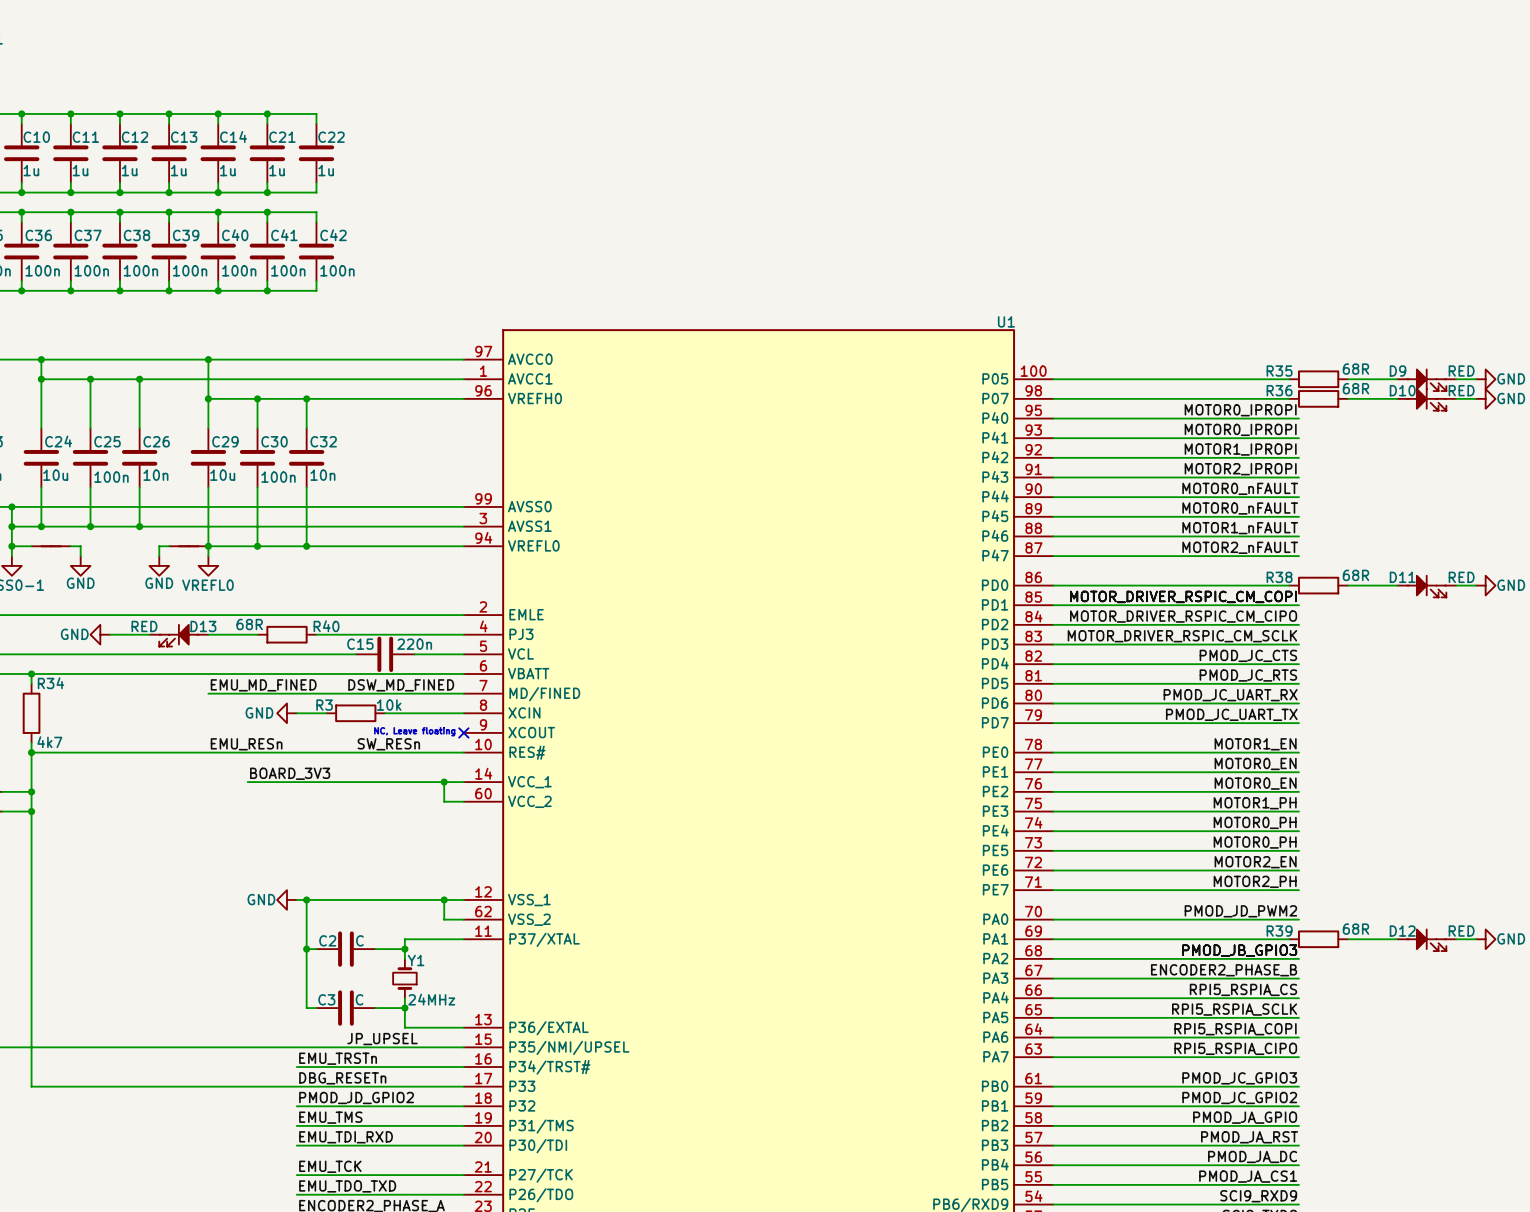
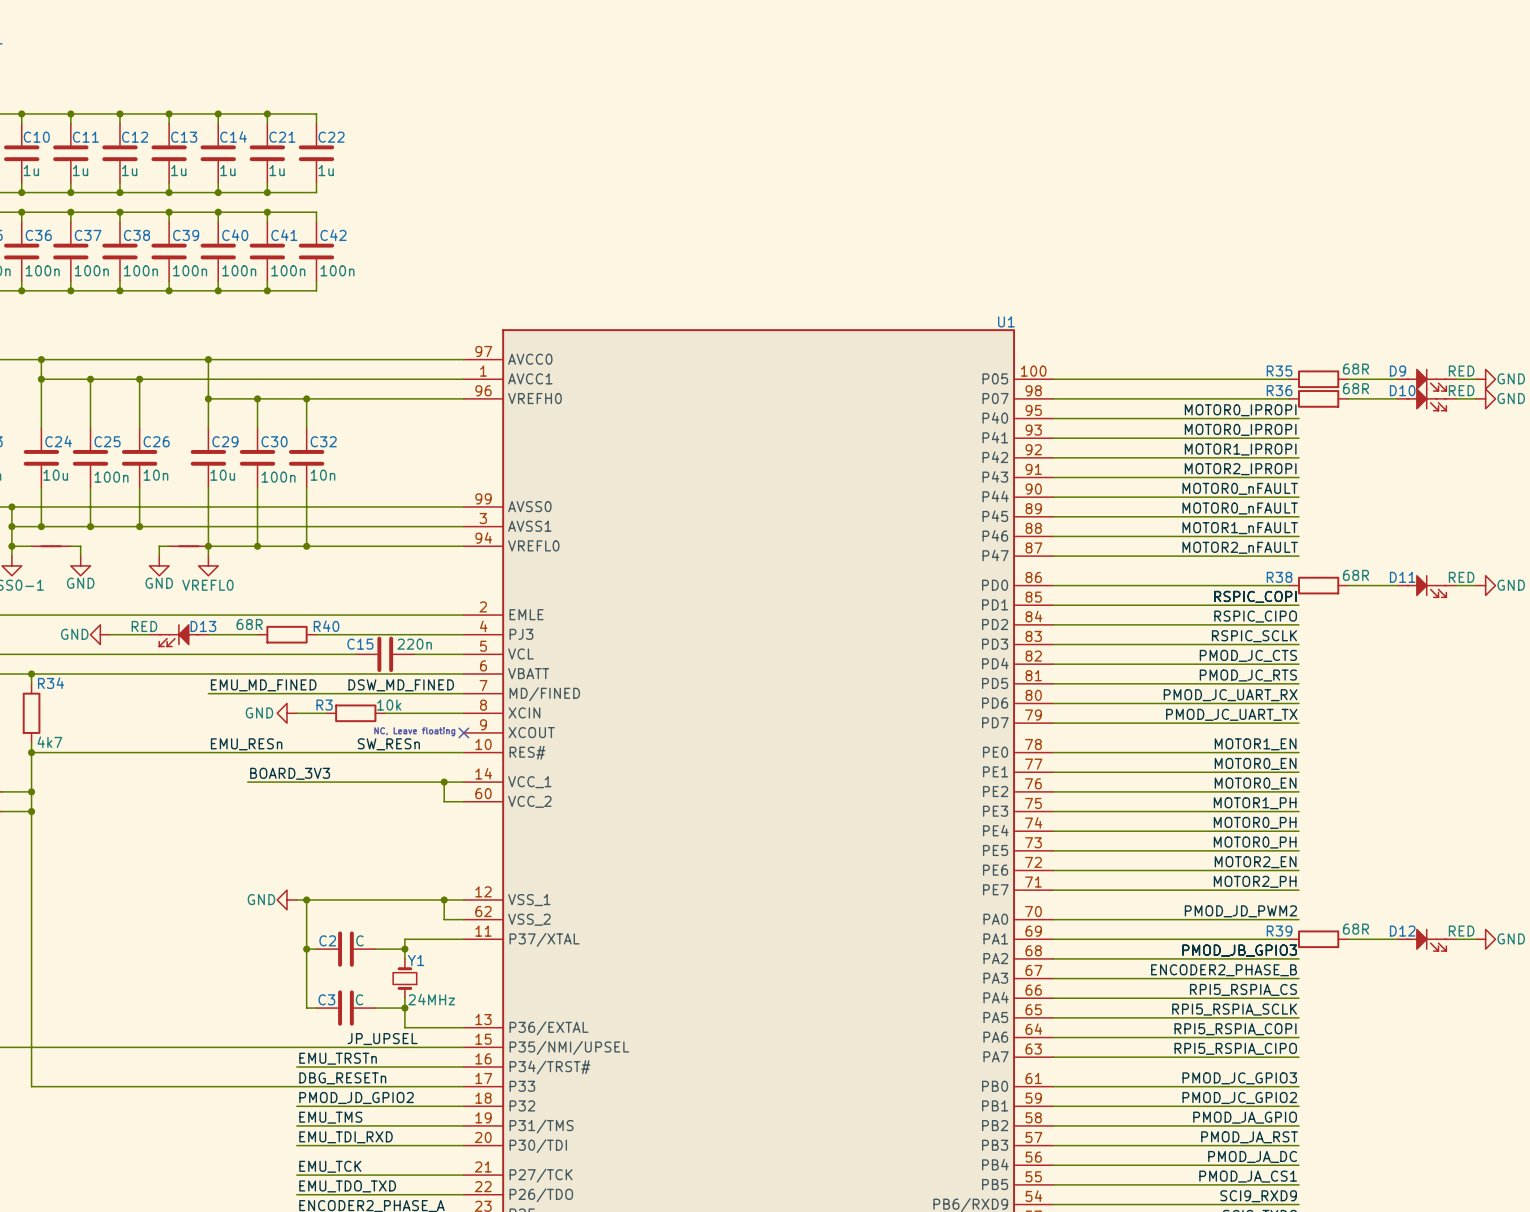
label: MOTOR_DRIVER_RSPIC_CM_COPI (1183, 596) -> RSPIC_COPI (1255, 596)
label: MOTOR_DRIVER_RSPIC_CM_CIPO (1183, 616) -> RSPIC_CIPO (1255, 616)
label: MOTOR_DRIVER_RSPIC_CM_SCLK (1182, 636) -> RSPIC_SCLK (1254, 636)

